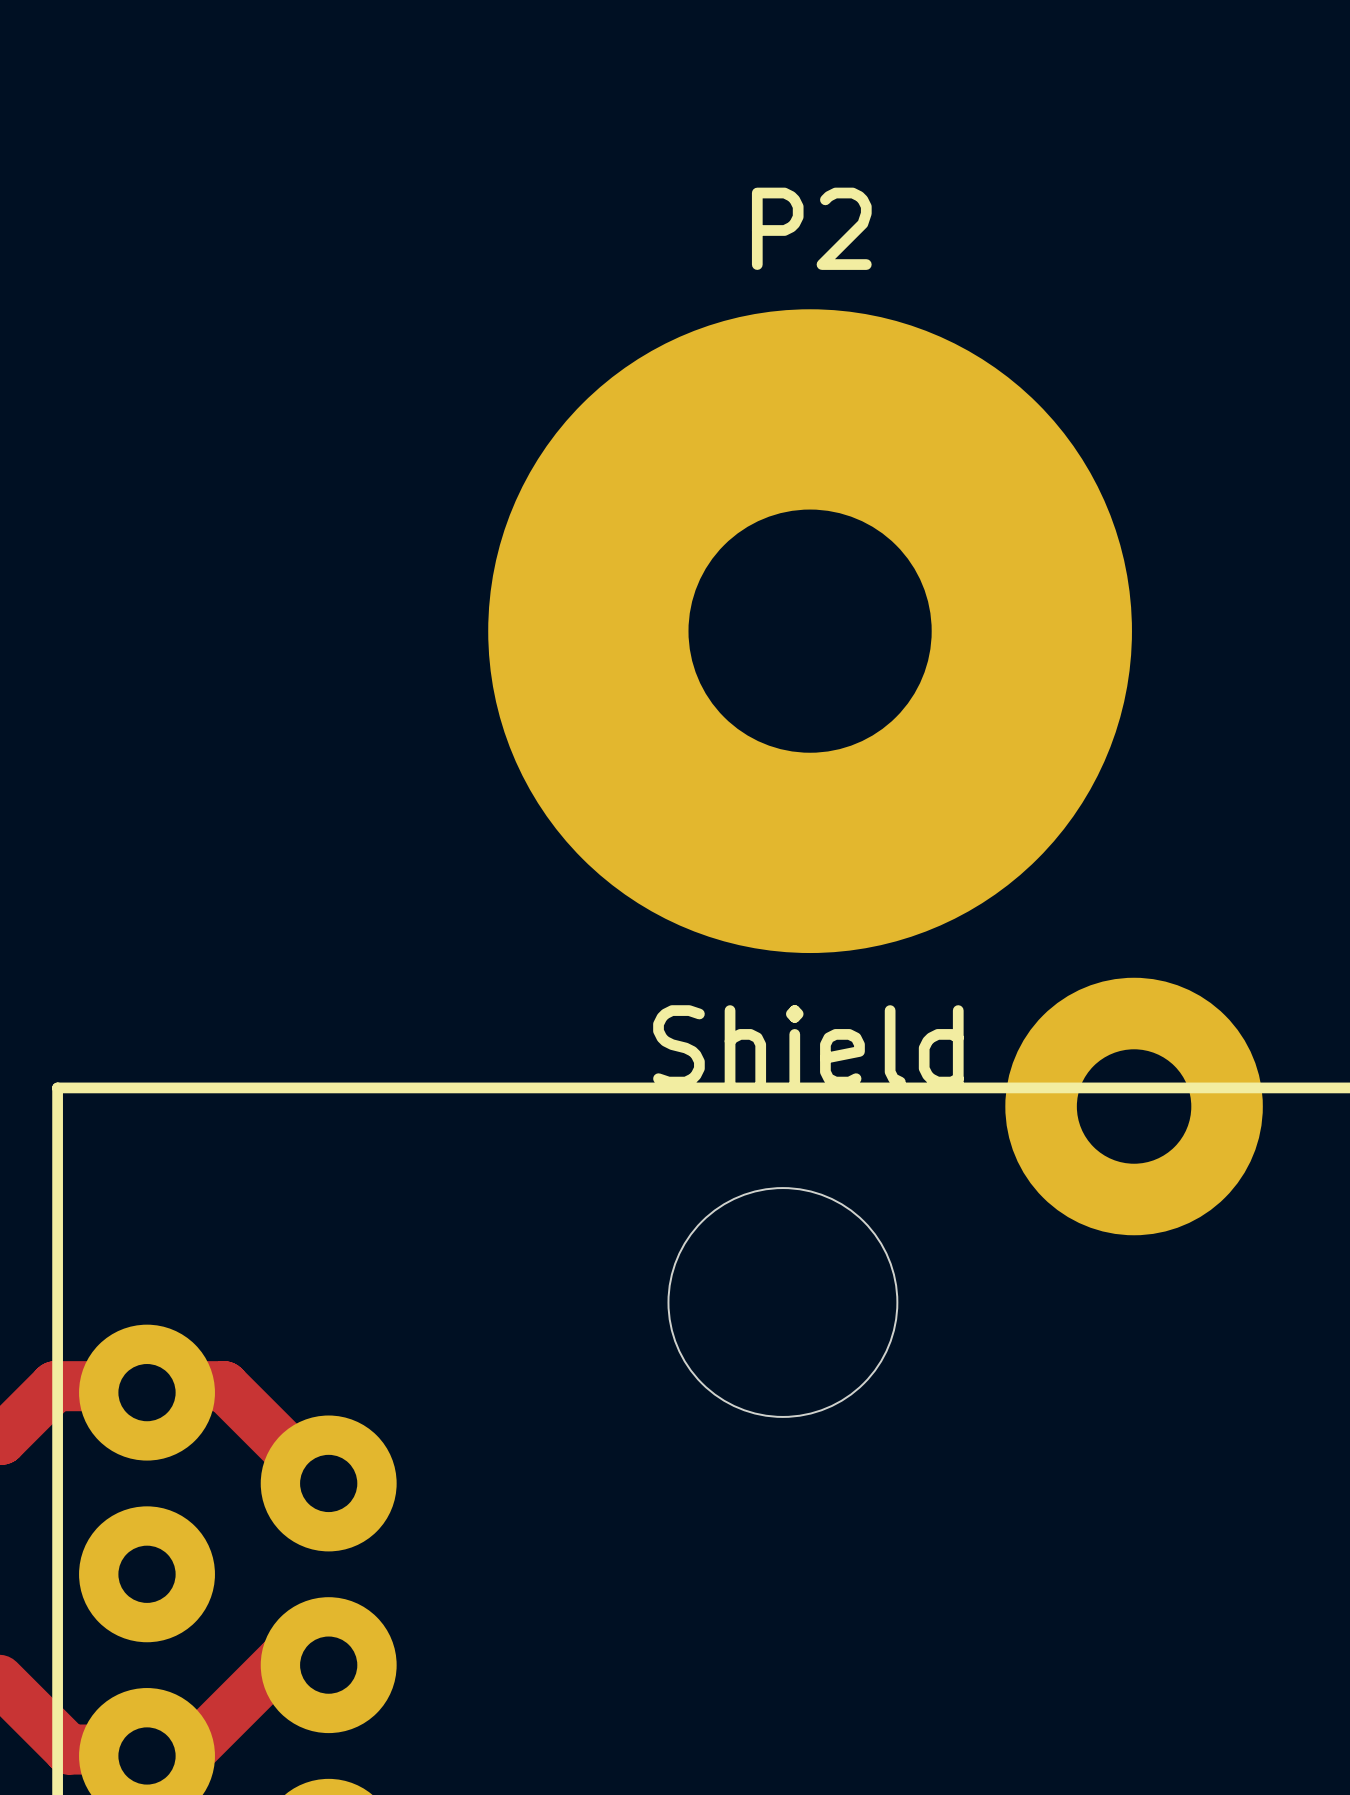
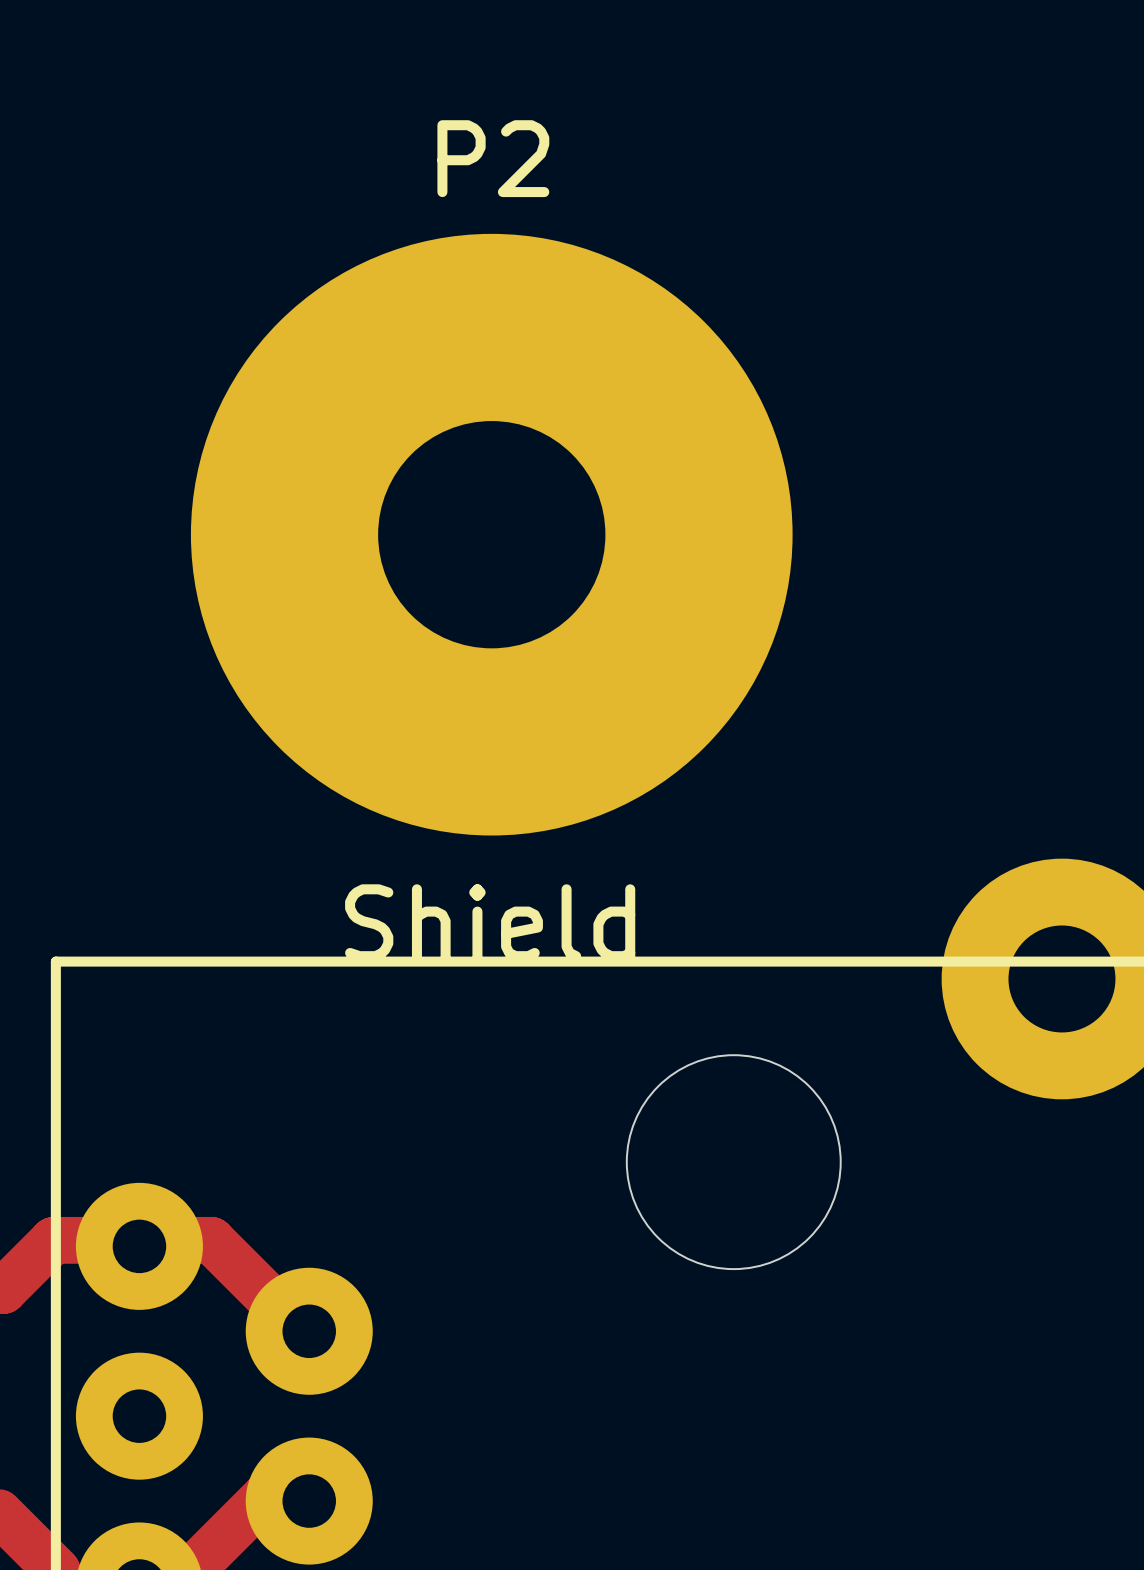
P2 position: (810, 631) -> (491, 534)

